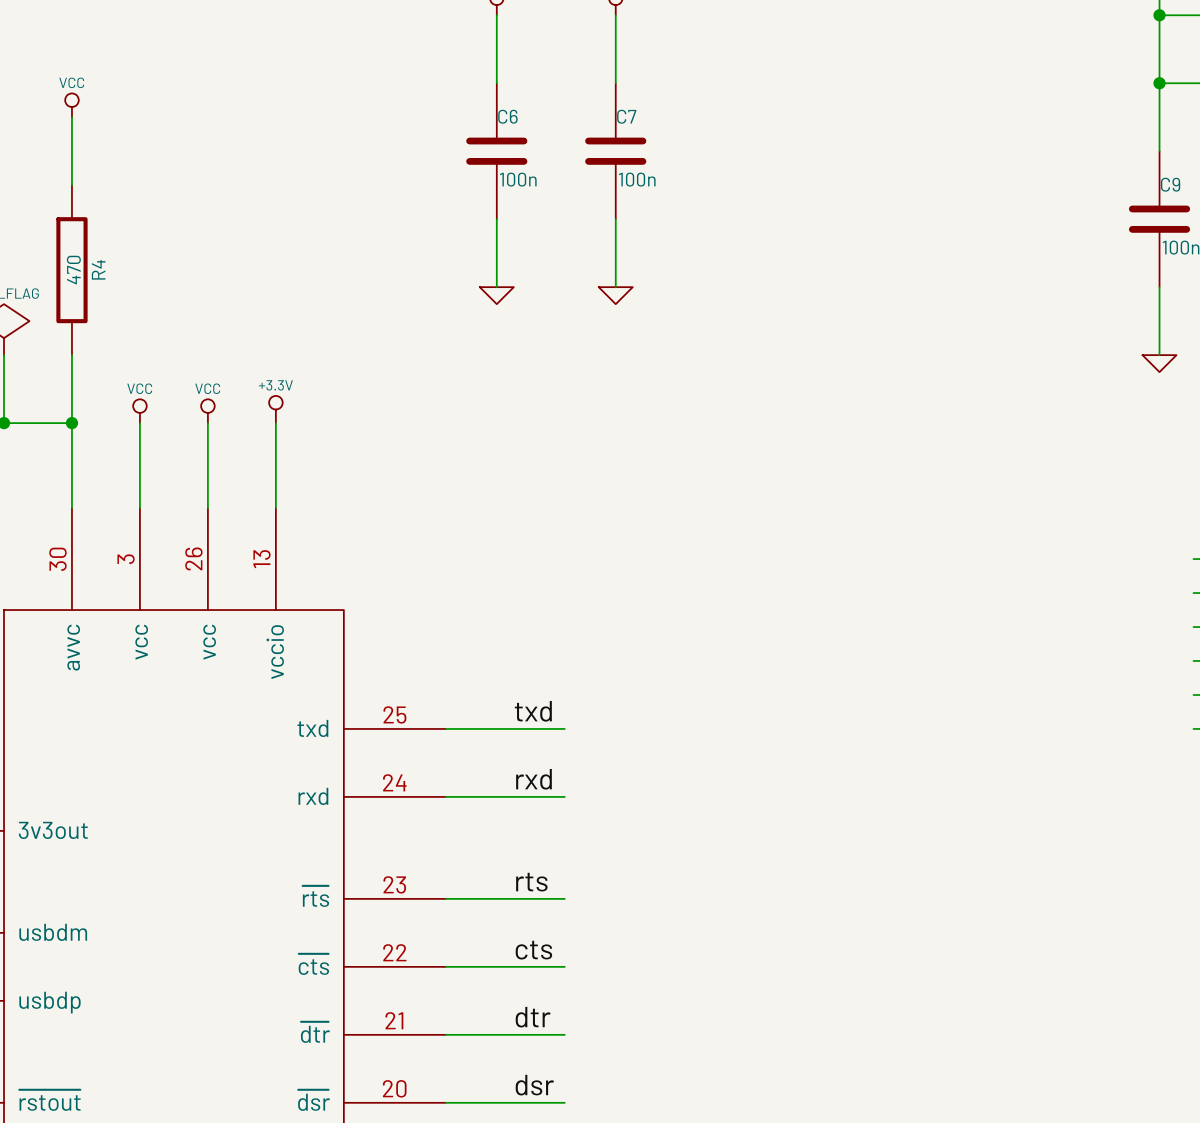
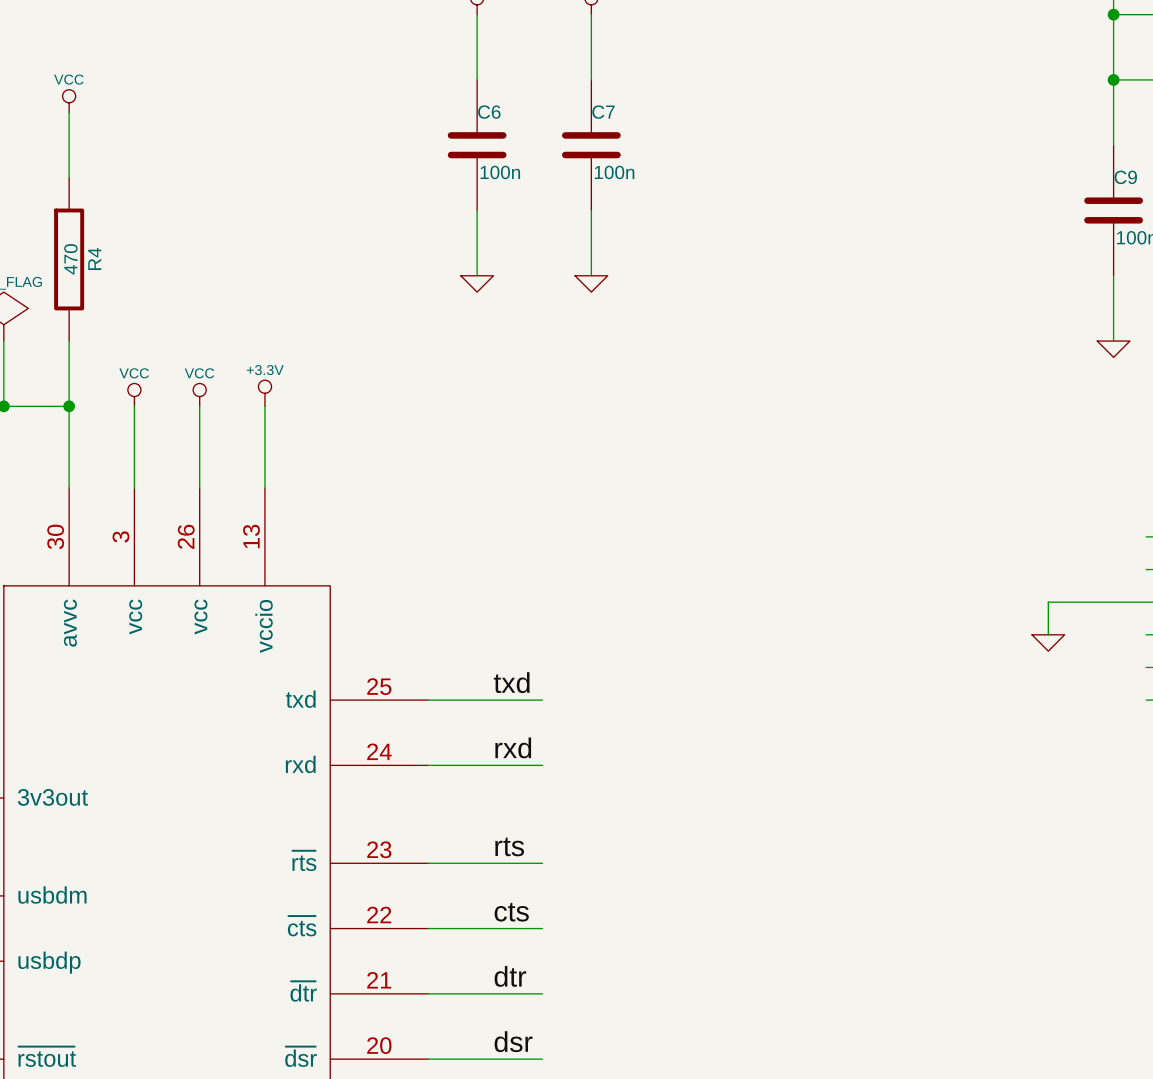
wire: none -> (1146, 602) (1048, 602) (1048, 634)
power symbol: none -> (1048, 642)

